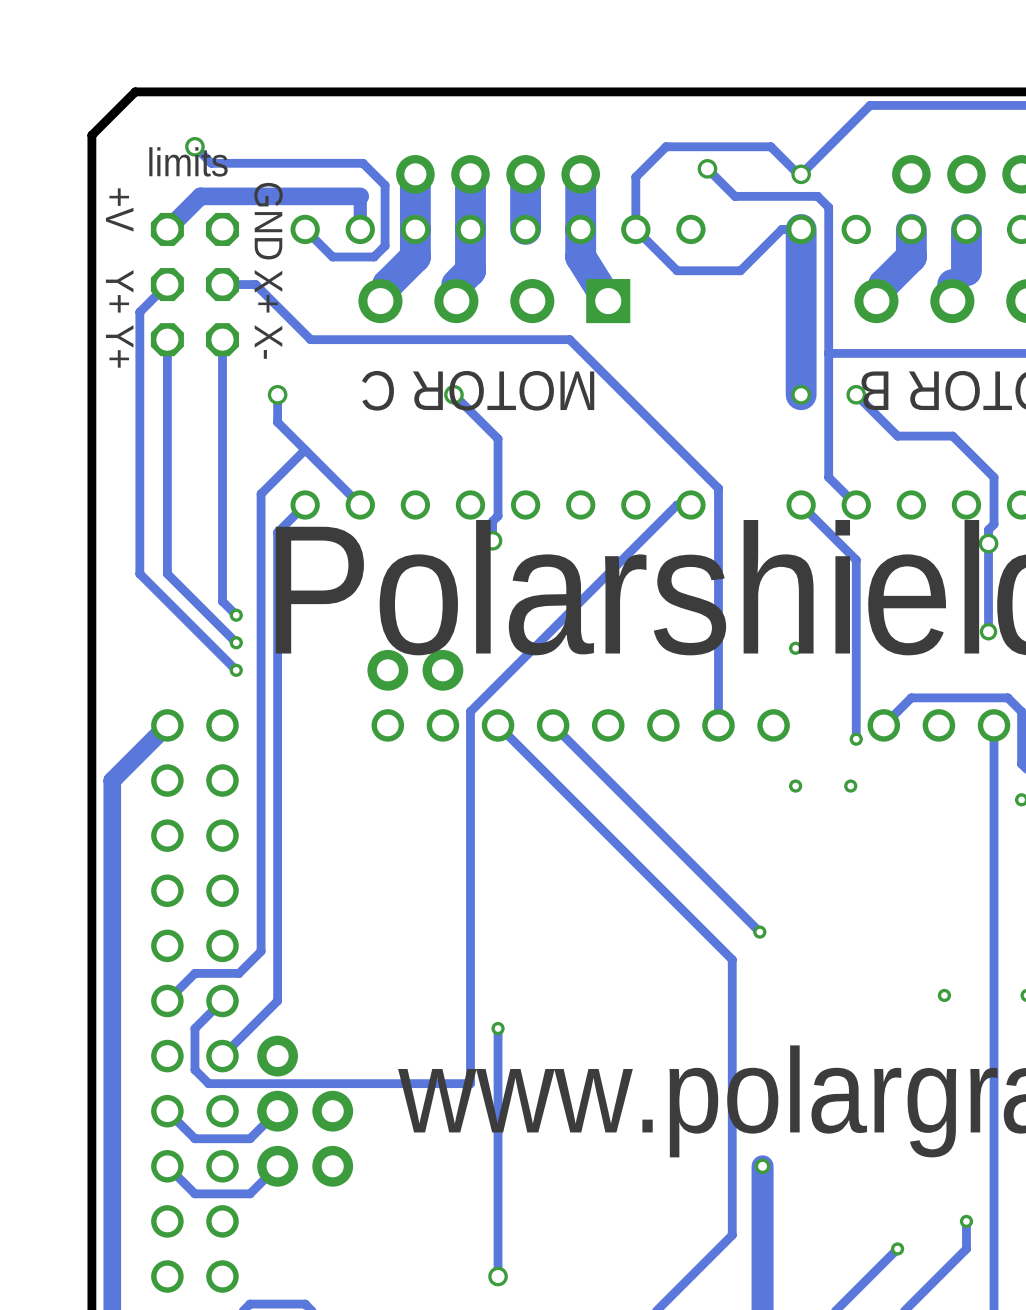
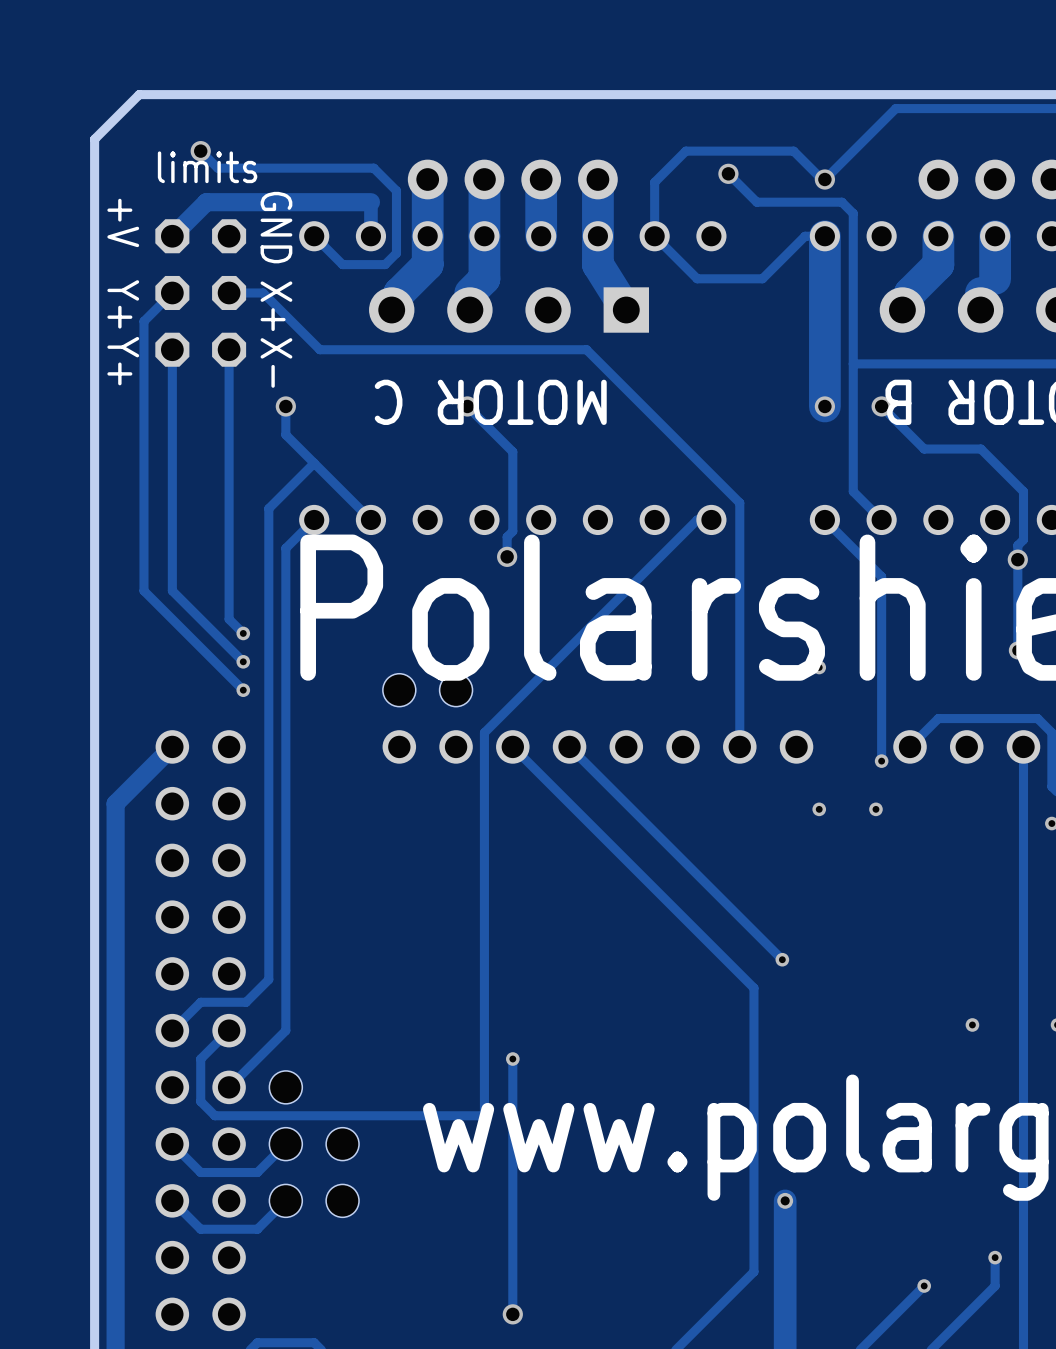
part footprint: [367, 649, 464, 691] -> [382, 673, 473, 707]
part footprint: [257, 1035, 299, 1187] -> [269, 1070, 303, 1218]
part footprint: [312, 1090, 354, 1187] -> [326, 1127, 360, 1218]

